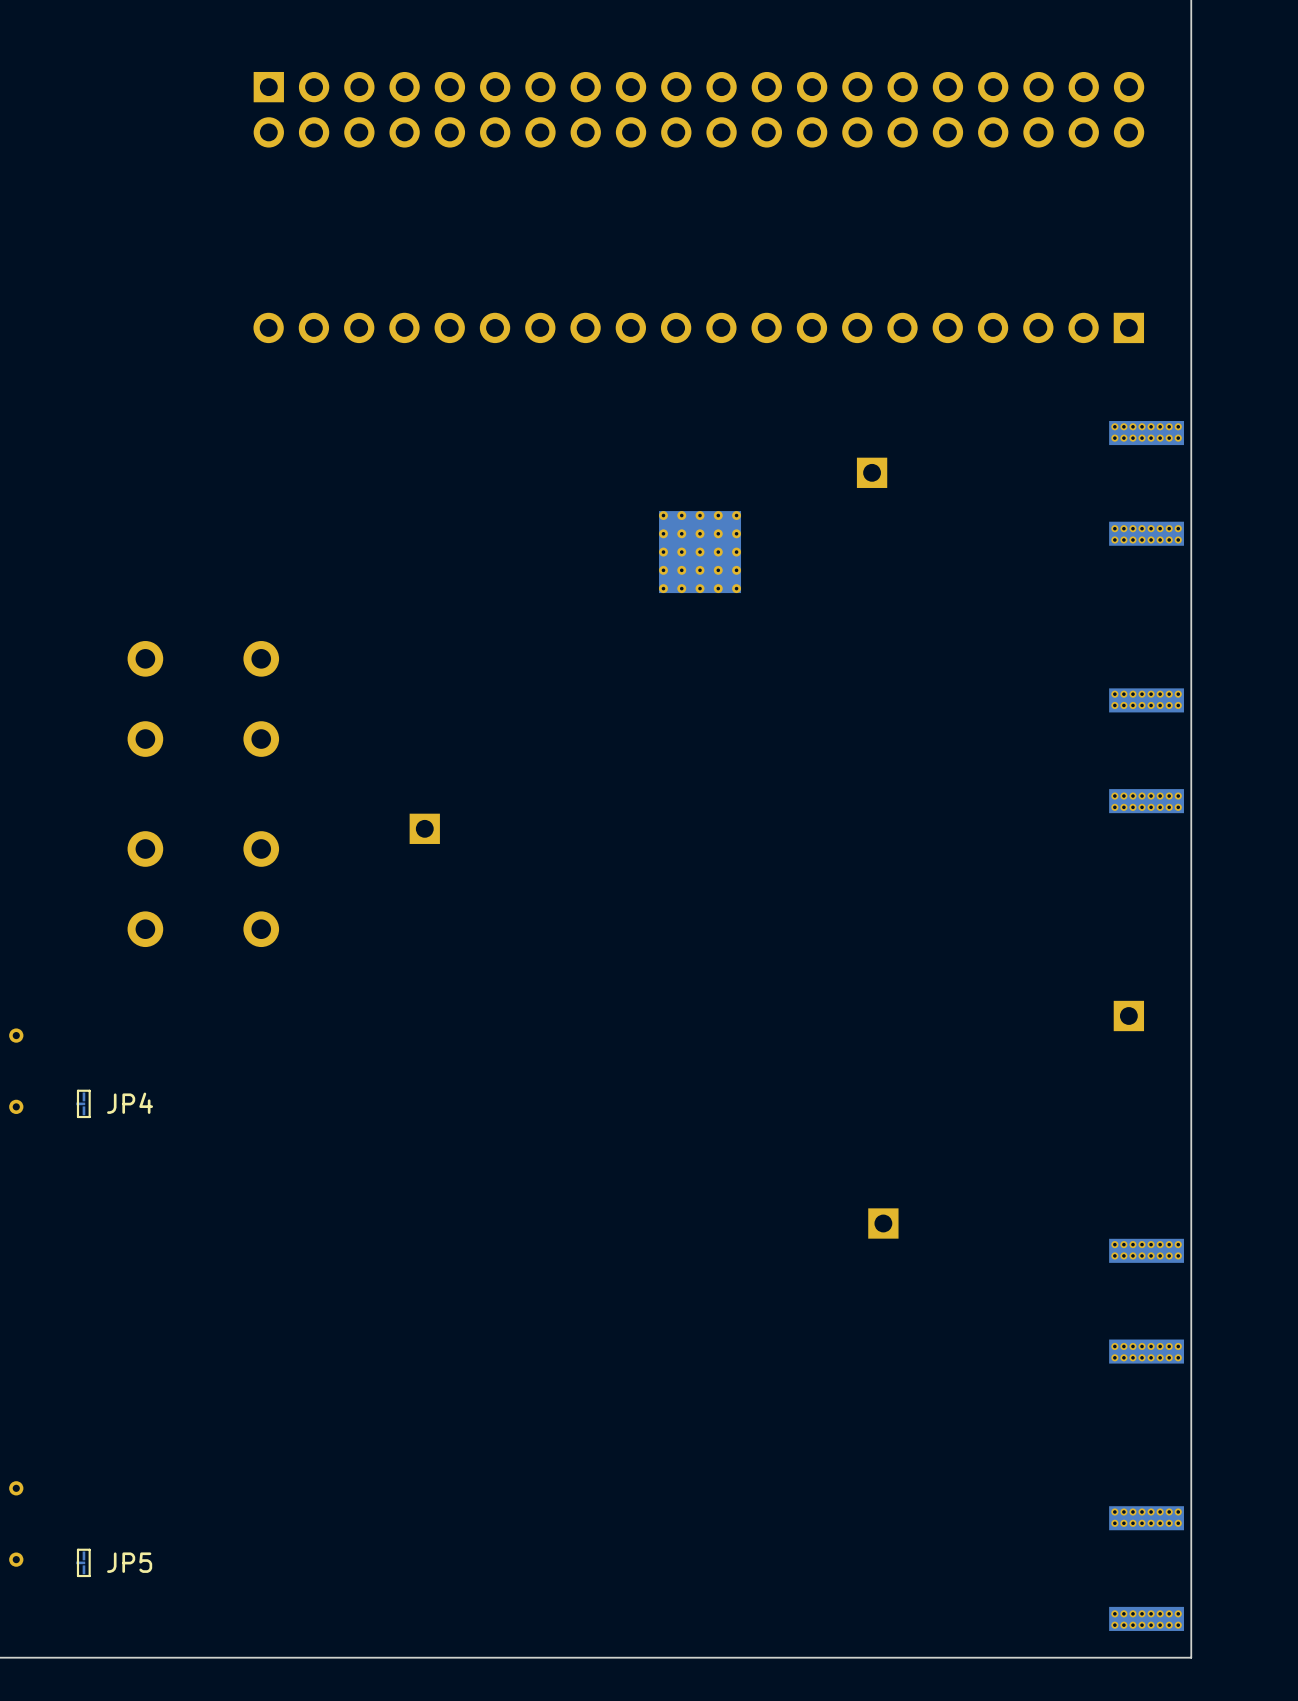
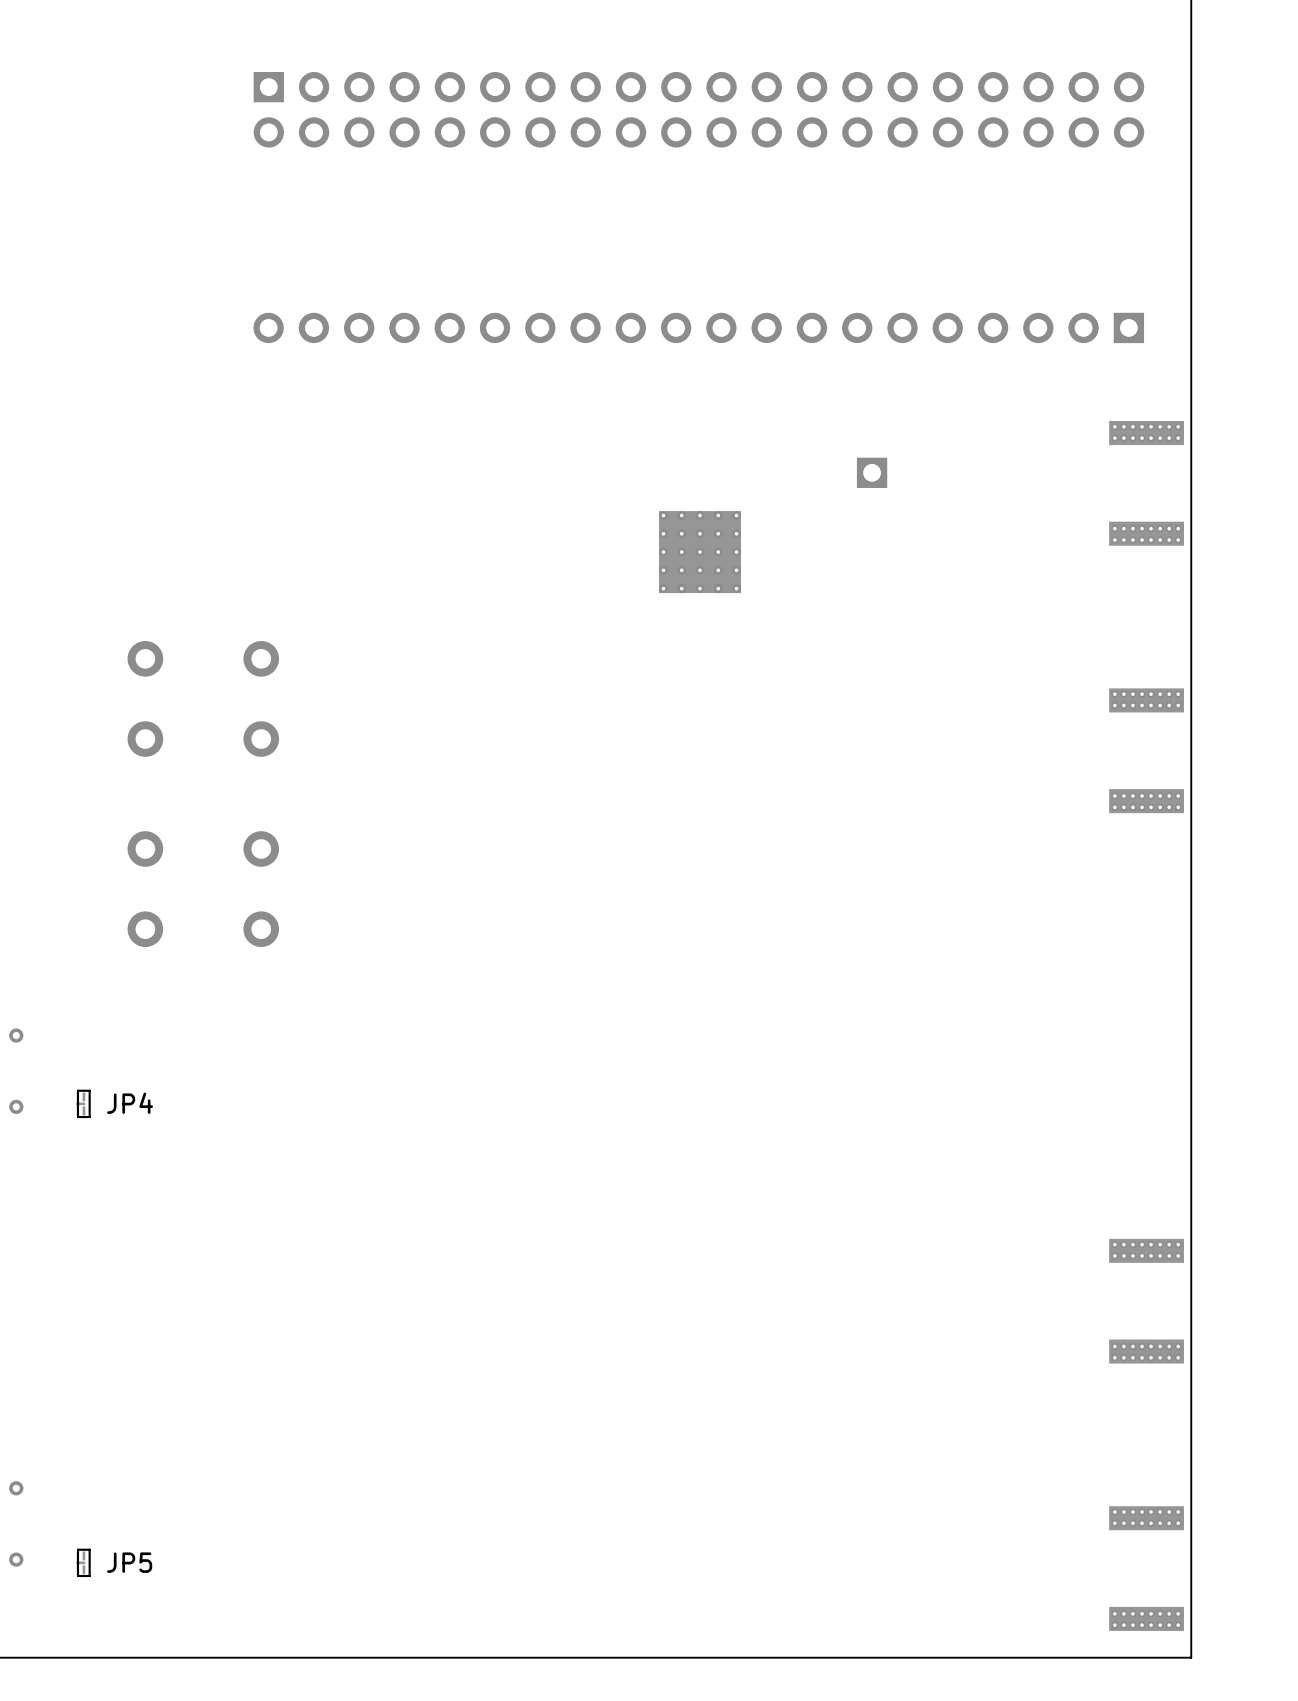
part: (424, 828) -> none
part: (1128, 1015) -> none
part: (883, 1223) -> none

